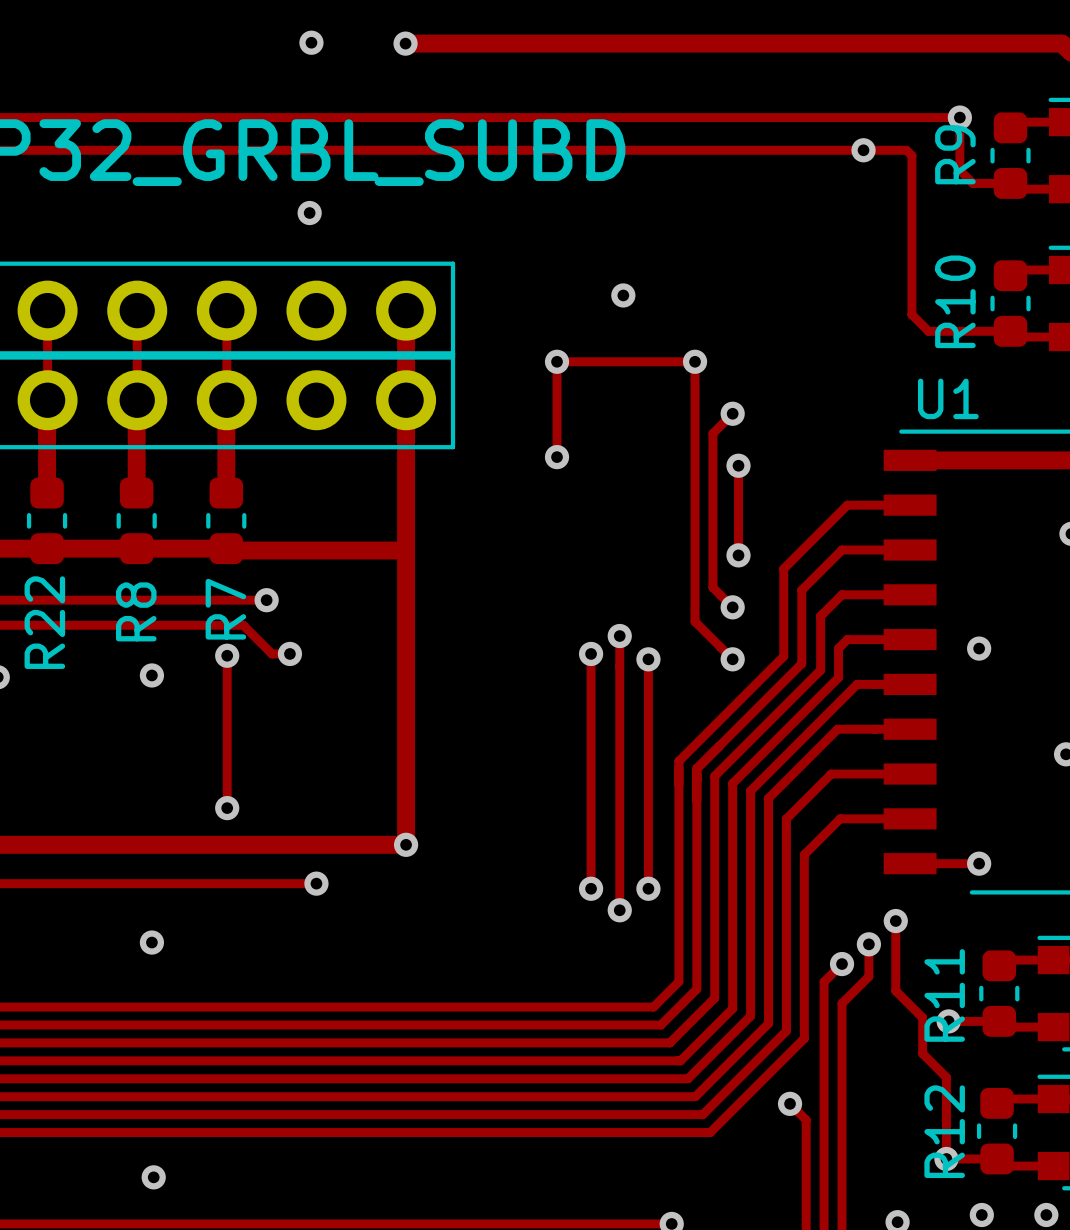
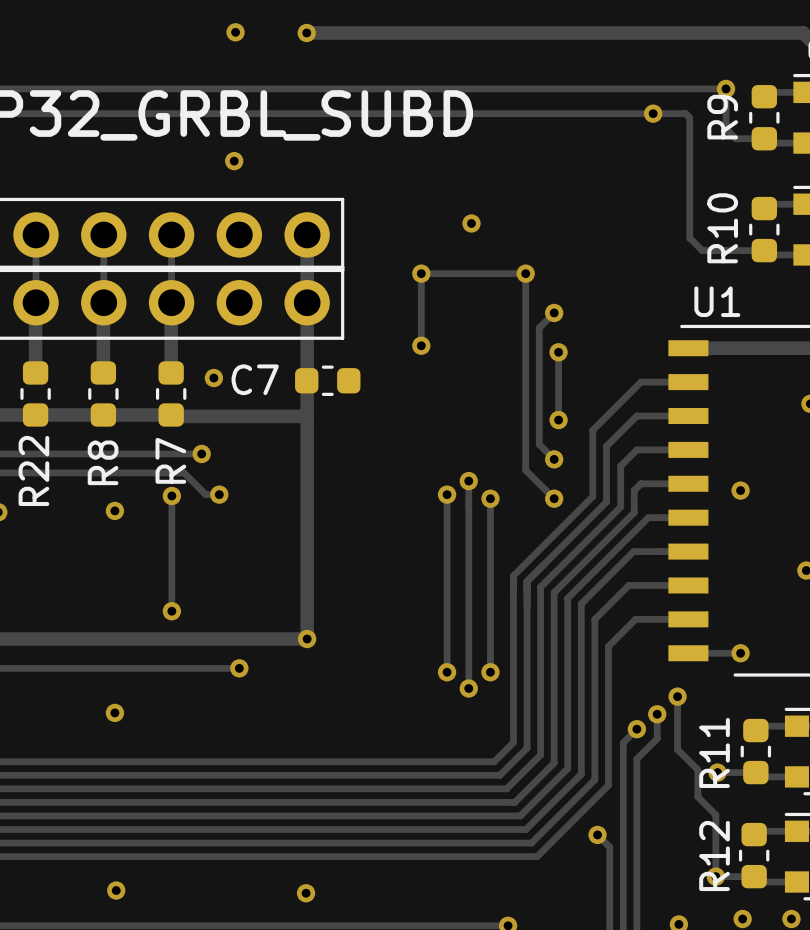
via: none -> (213, 378)
C7: none -> (327, 380)
via: none -> (306, 893)

